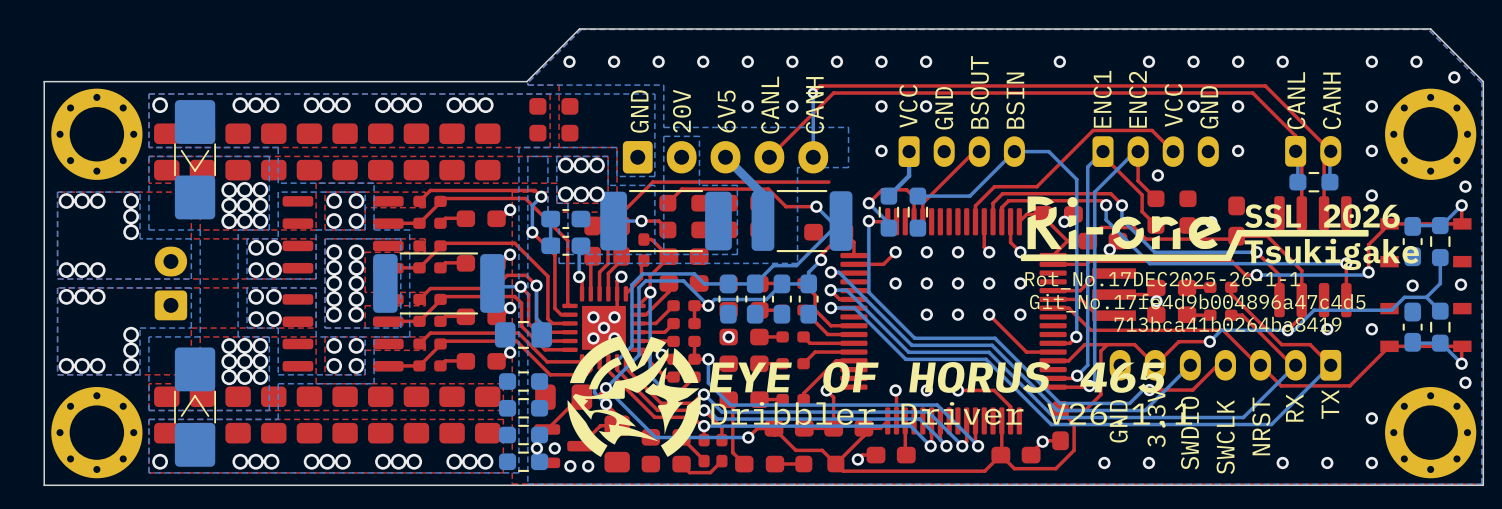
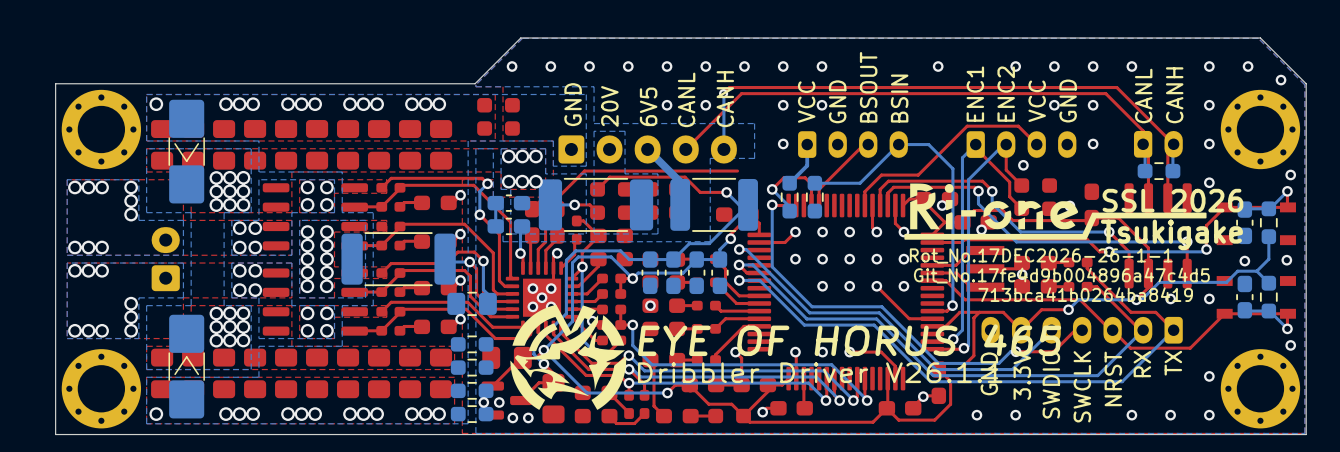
text: Rot_No.17DEC2025-26-1-1 (1162, 280) -> Rot_No.17DEC2026-26-1-1 (1041, 256)

